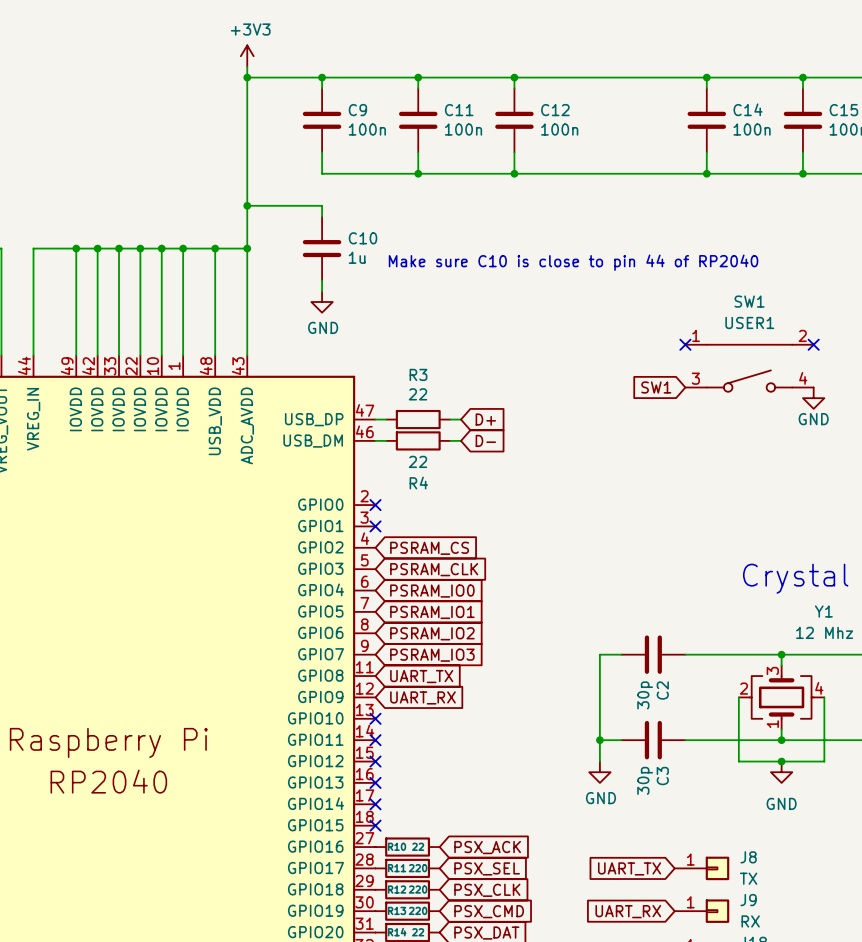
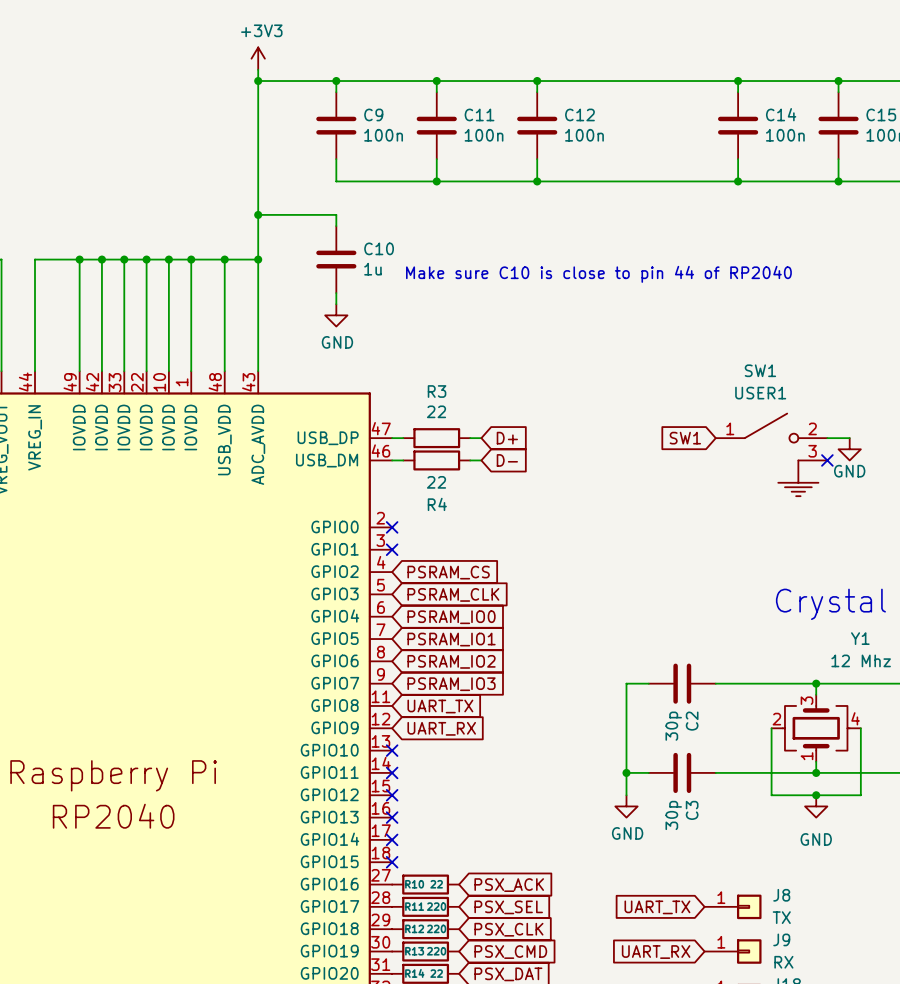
SW1 name position: SW1 (749, 301) -> SW1 (760, 370)
SW1 value position: USER1 (749, 322) -> USER1 (760, 393)
no-connect mark: (685, 344) -> none
SW1 symbol: [685, 344, 814, 393] -> [715, 412, 828, 497]
no-connect mark: (813, 344) -> none
global label position: SW1 (656, 387) -> SW1 (685, 438)
power symbol position: GND (813, 398) -> GND (849, 449)
wire: none -> (827, 438) (849, 438)
no-connect mark: none -> (827, 460)

